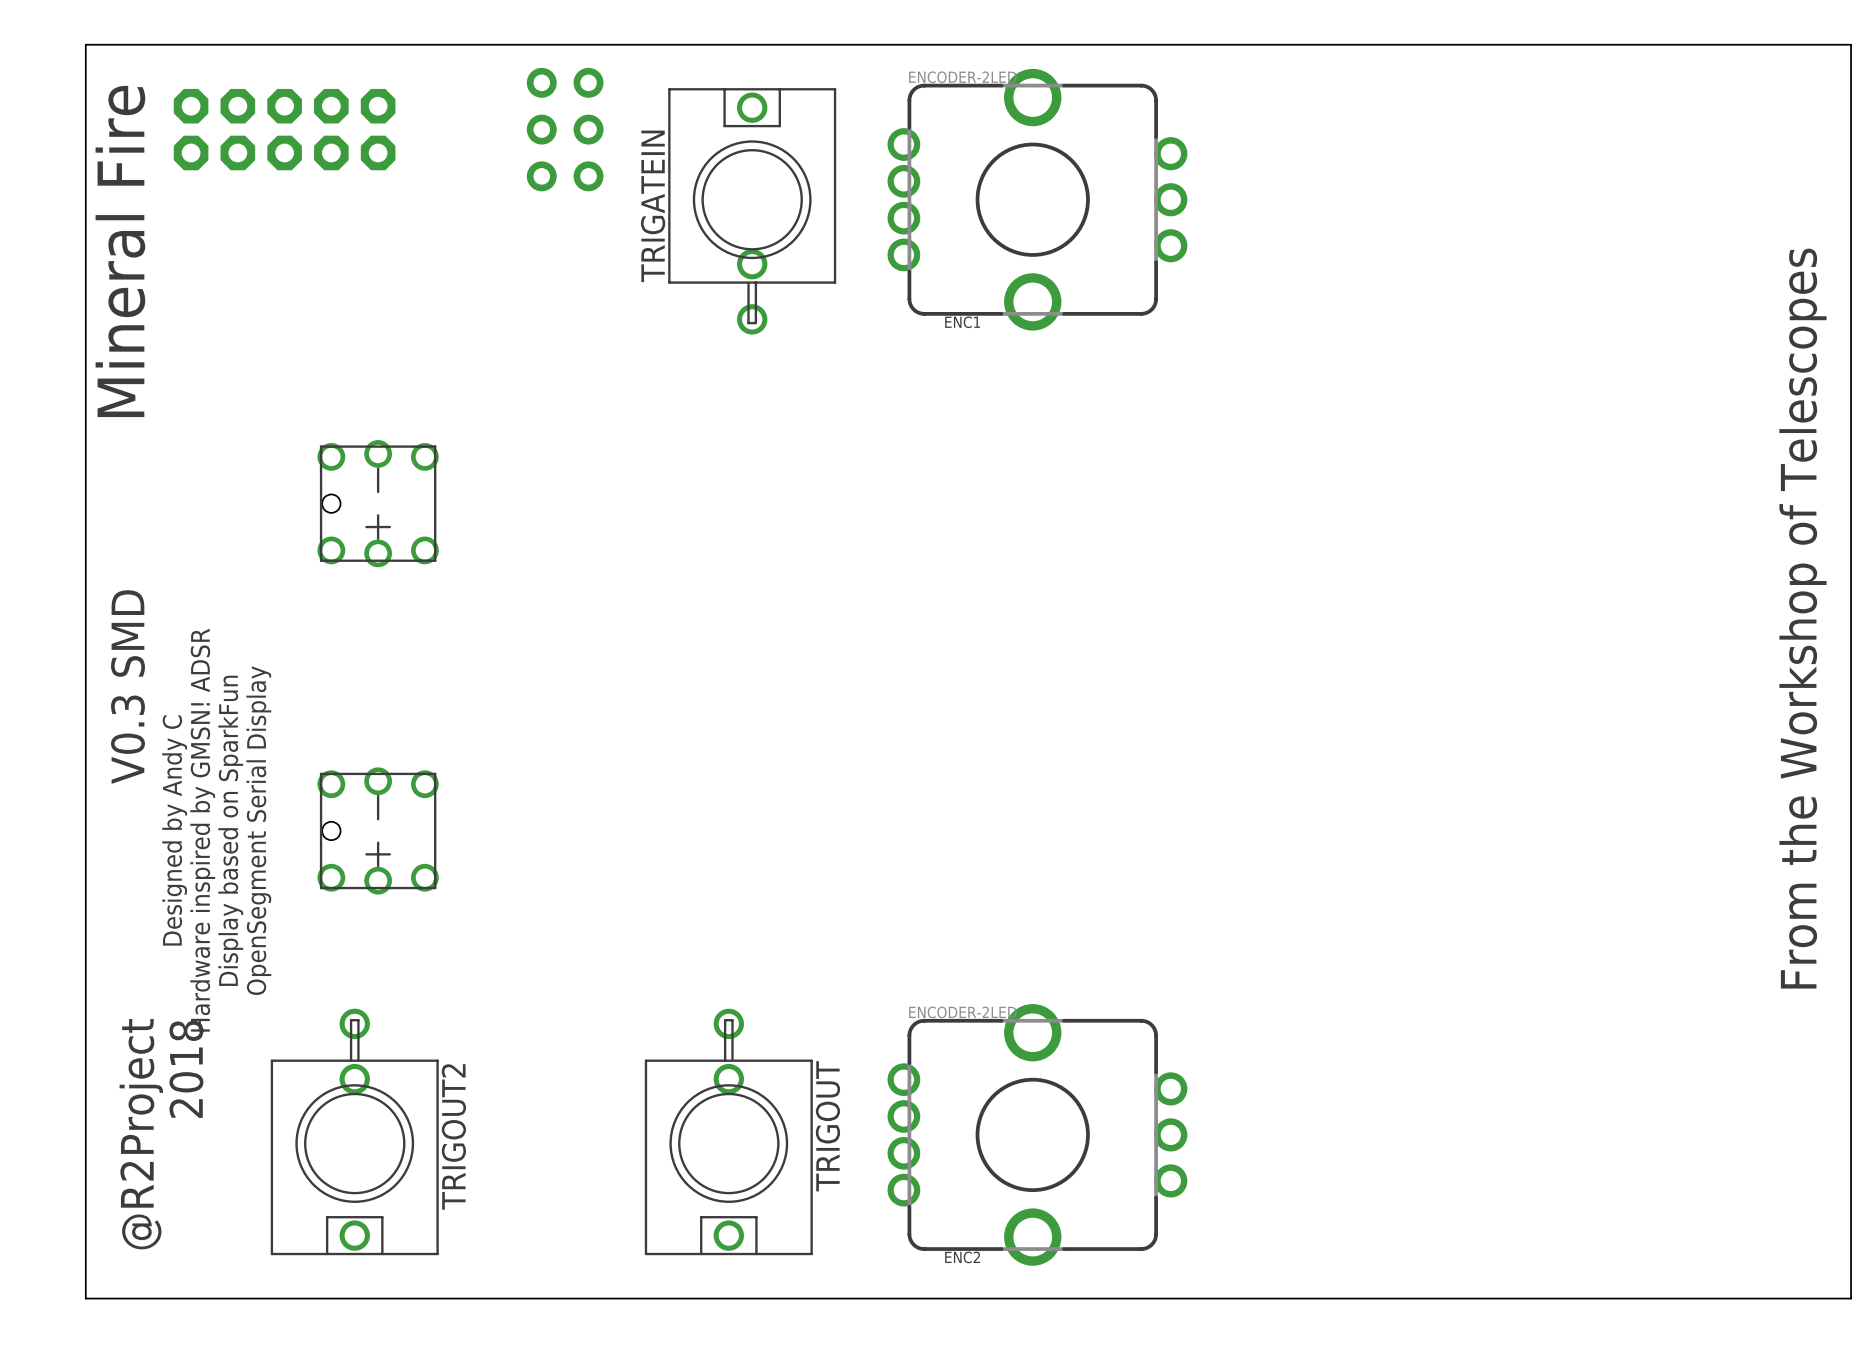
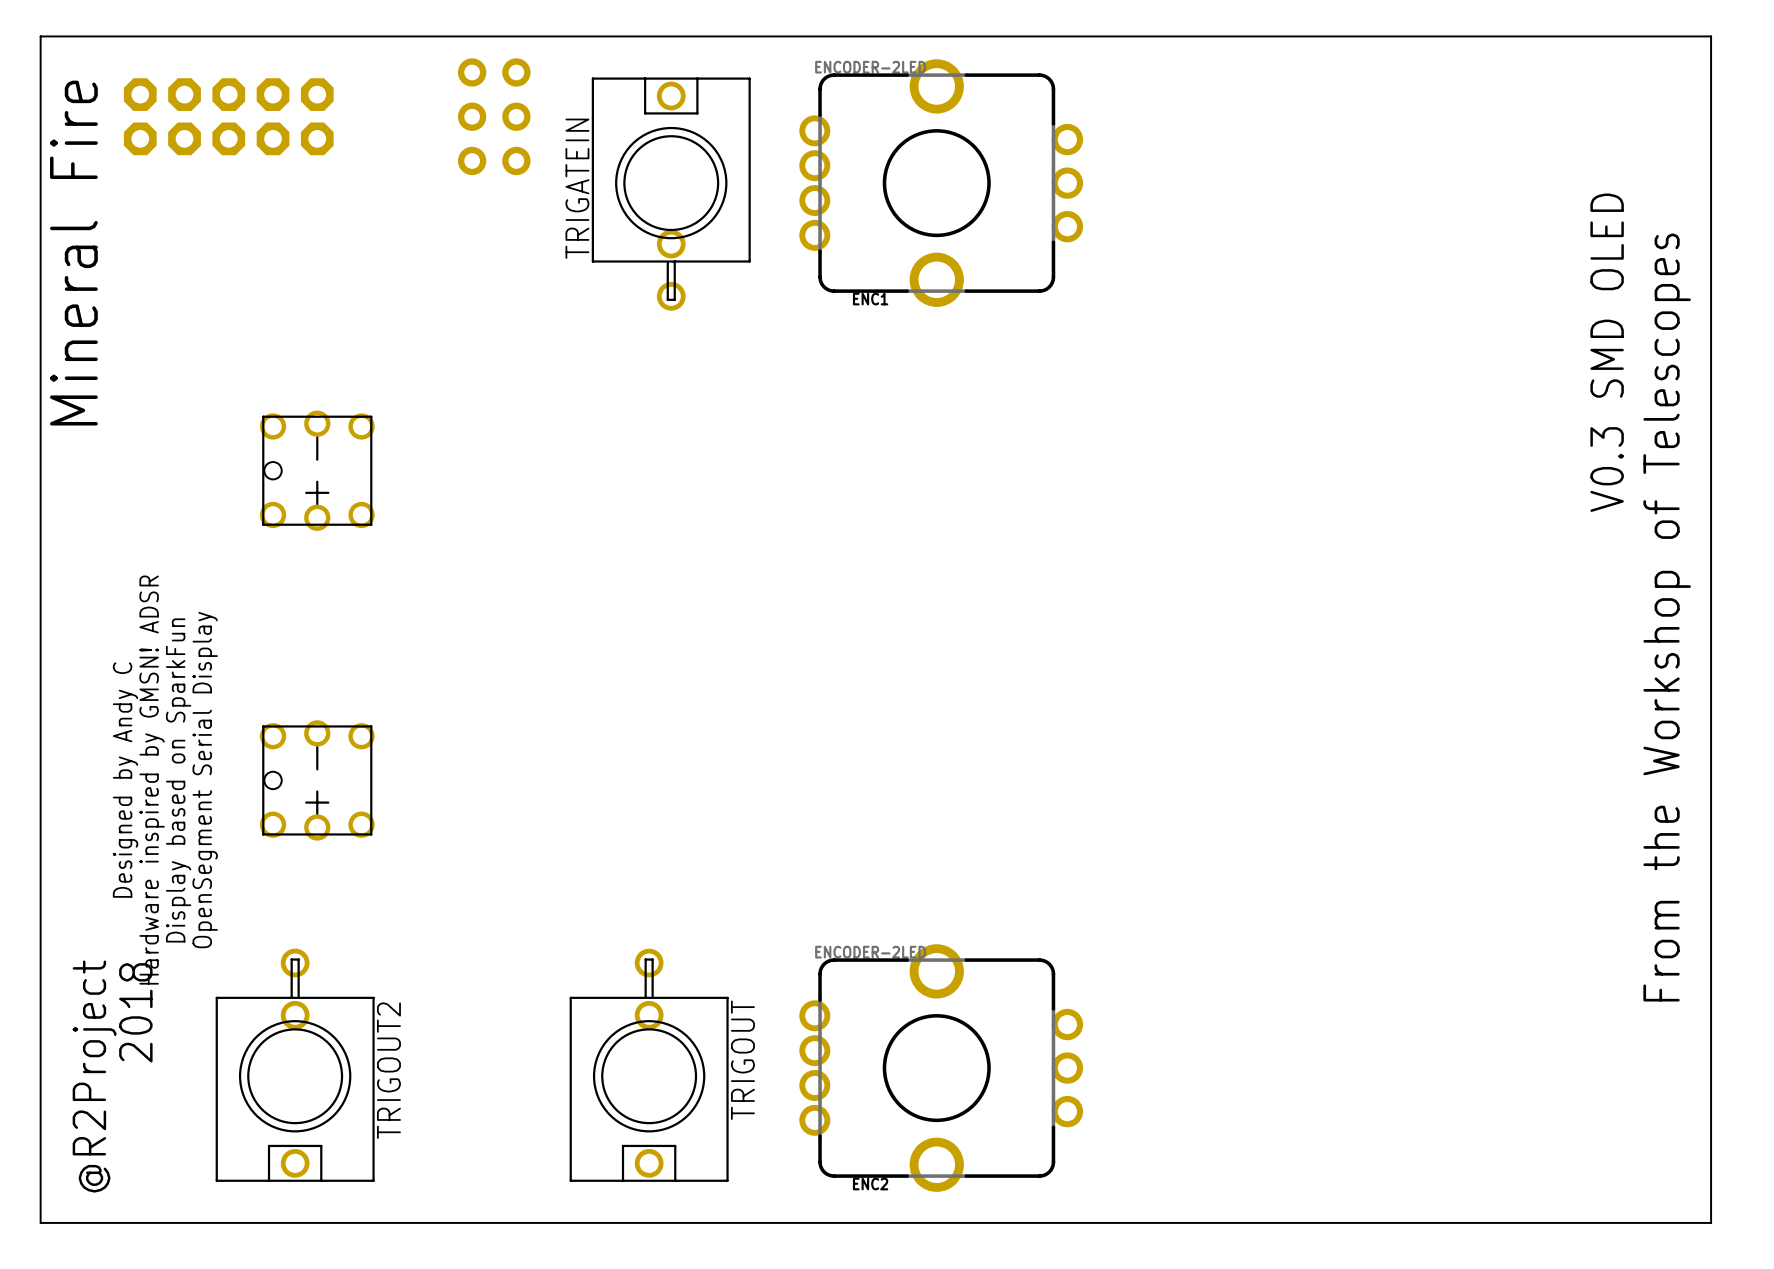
text: none -> V0.3 SMD OLED (1607, 352)
text: V0.3 SMD (127, 687) -> none

